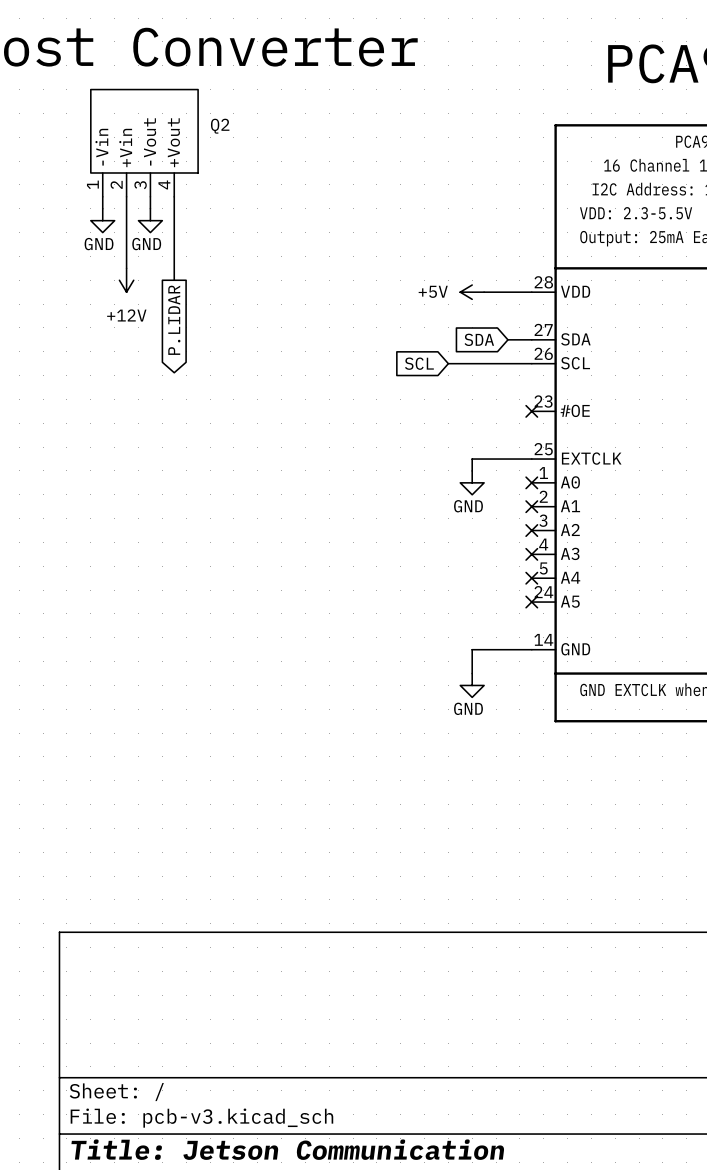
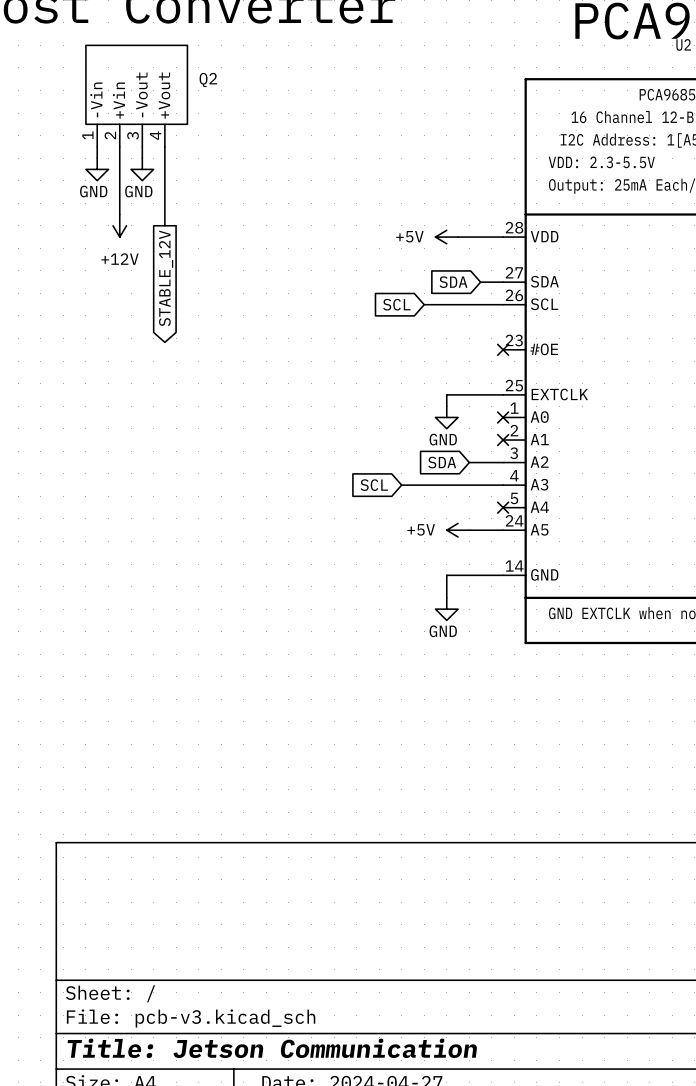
global label: P.LIDAR (174, 320) -> STABLE_12V (166, 278)
global label: none -> SDA (442, 462)
wire: none -> (469, 462) (503, 462)
no-connect mark: (531, 530) -> none
global label: none -> SCL (374, 485)
wire: none -> (401, 485) (503, 485)
no-connect mark: (531, 554) -> none
power symbol: none -> +5V (458, 530)
wire: none -> (469, 530) (503, 530)
no-connect mark: (531, 602) -> none

